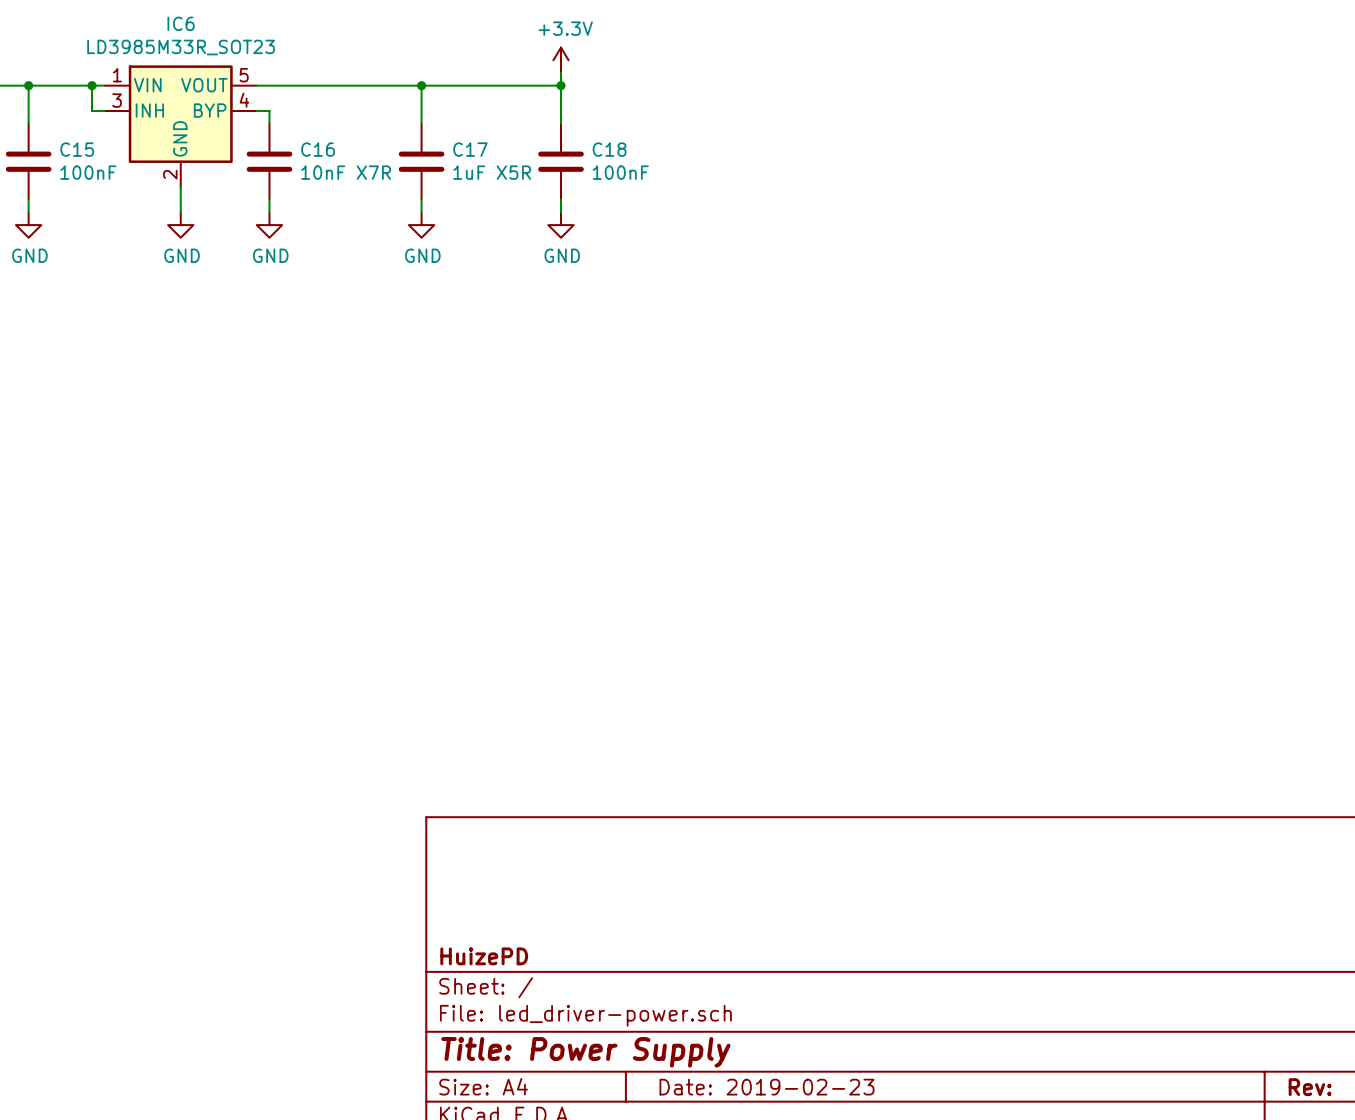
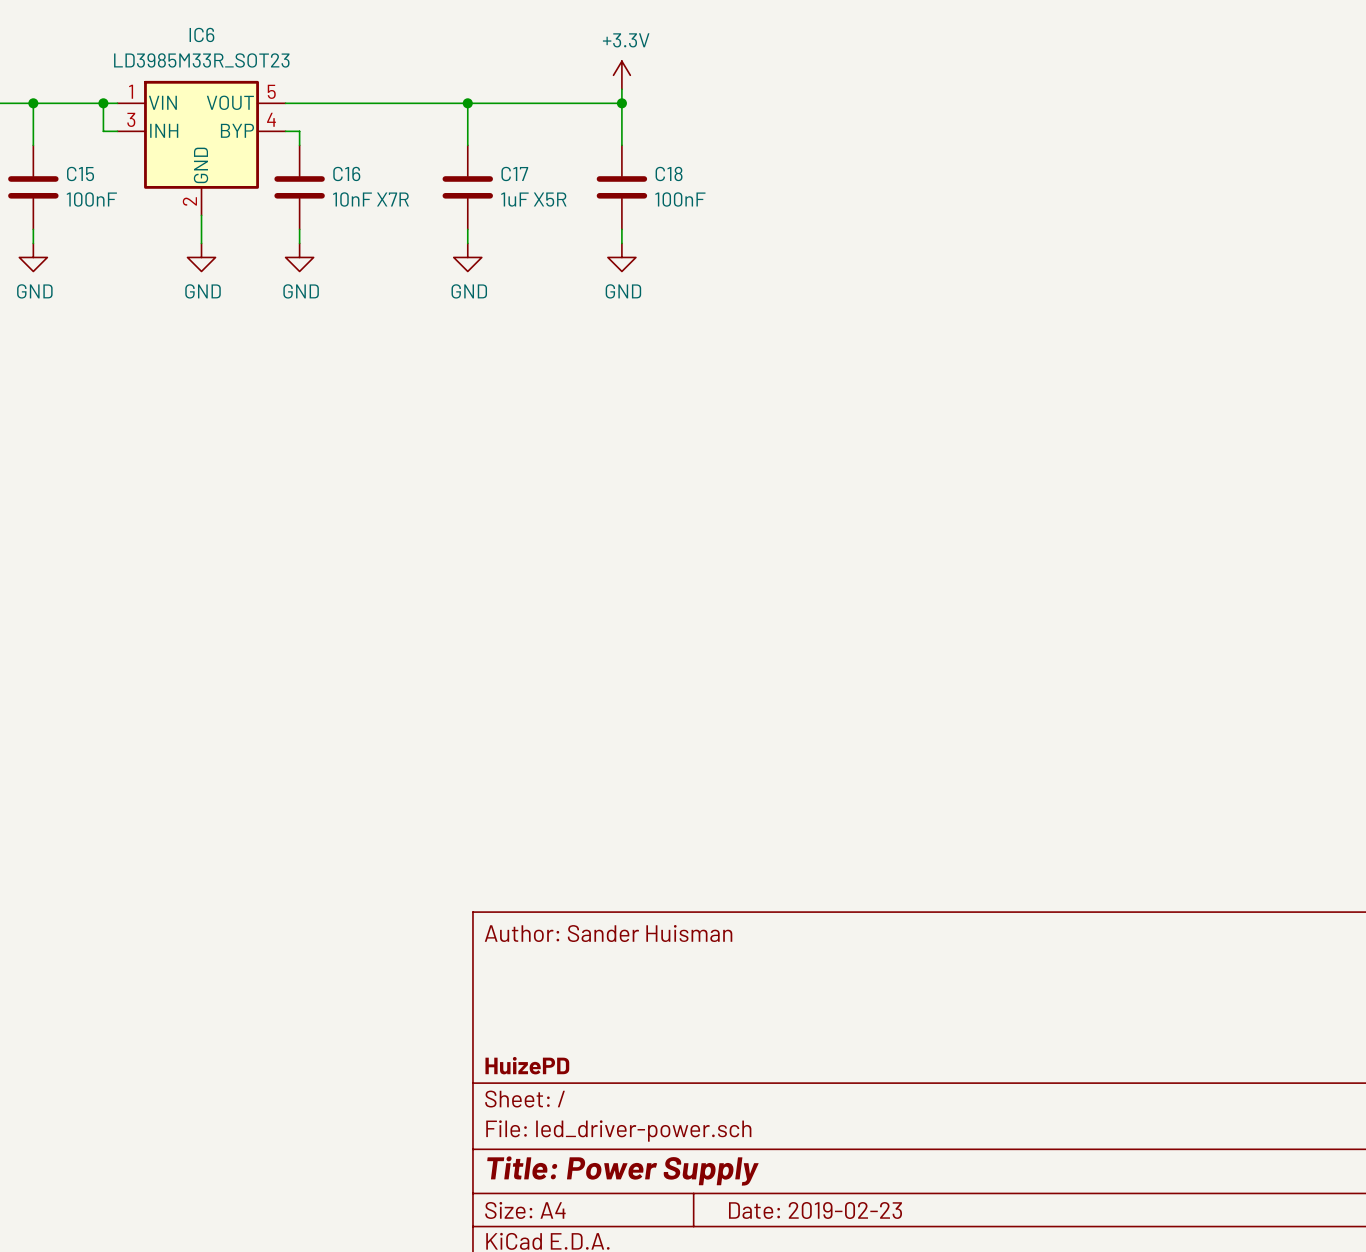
title block: none -> Author: Sander Huisman (608, 933)

